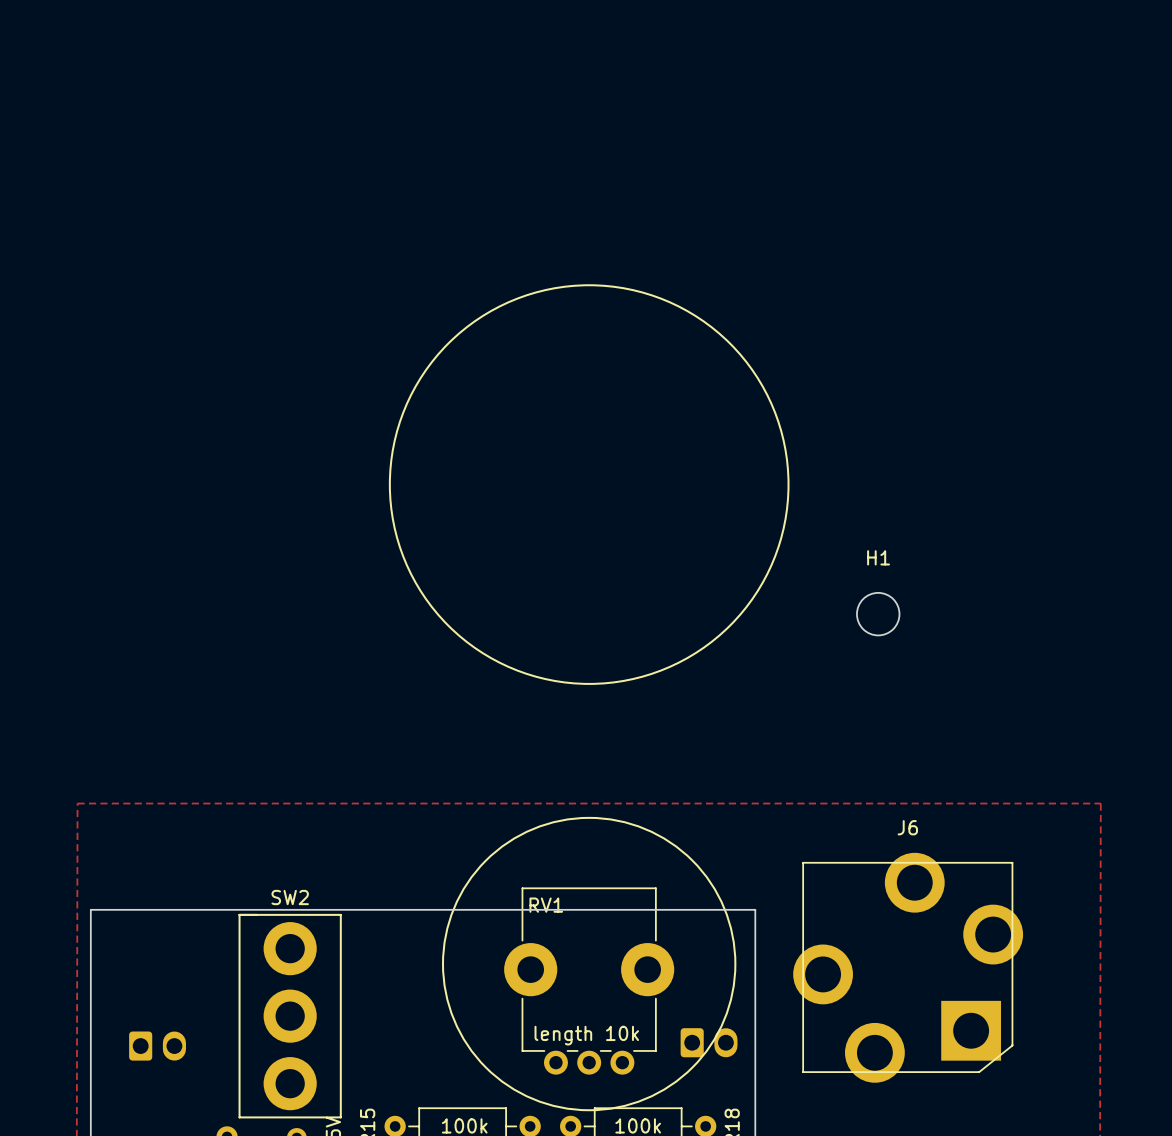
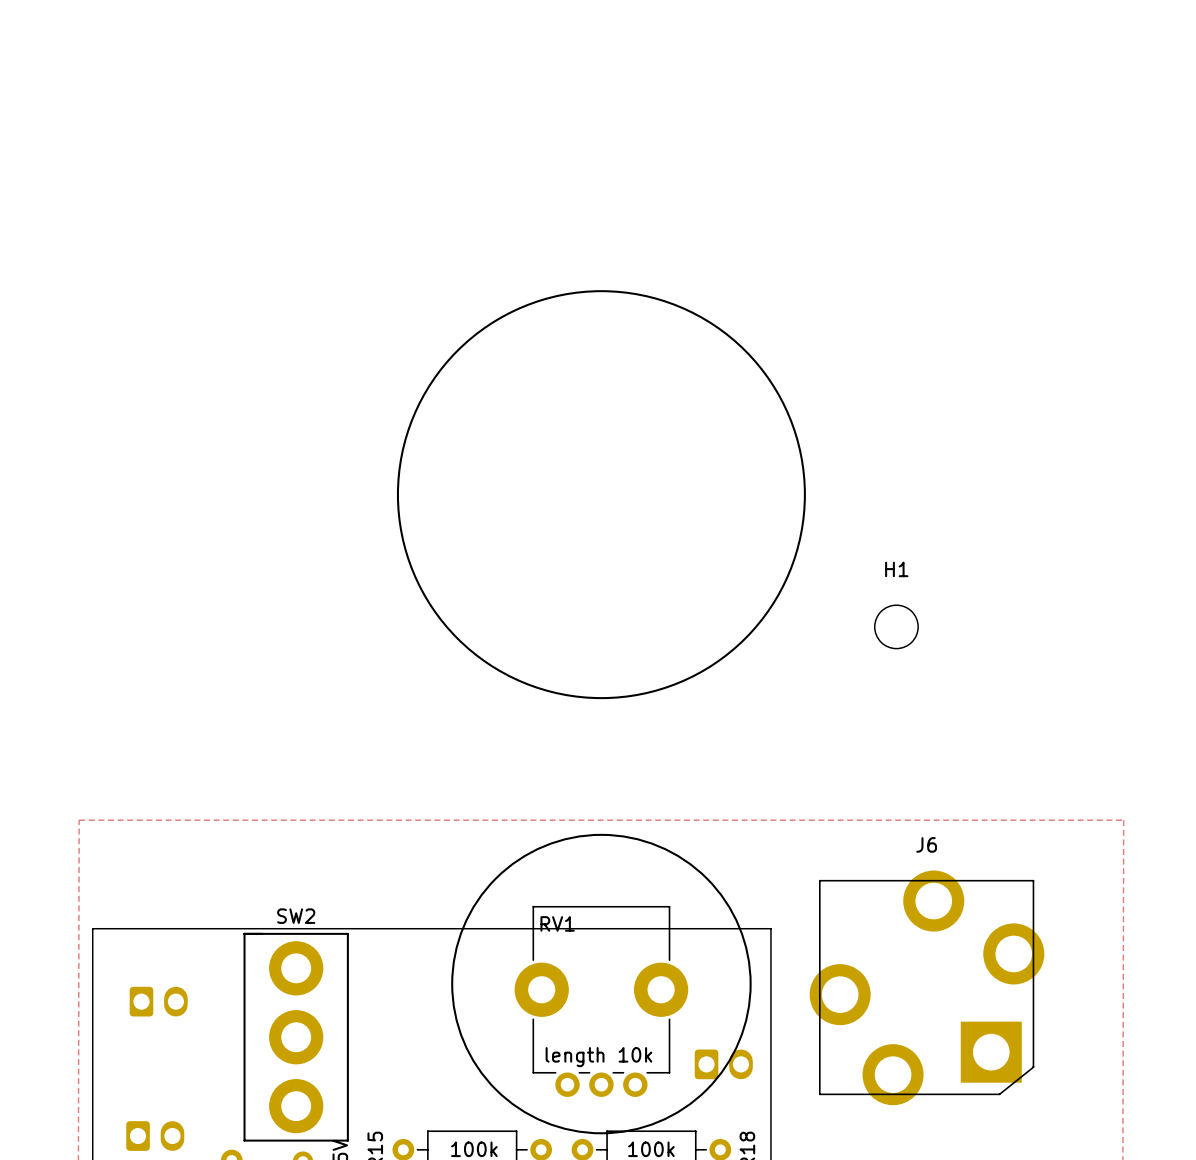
part: none -> (158, 1001)
part: (157, 1046) -> none
part: none -> (155, 1136)

